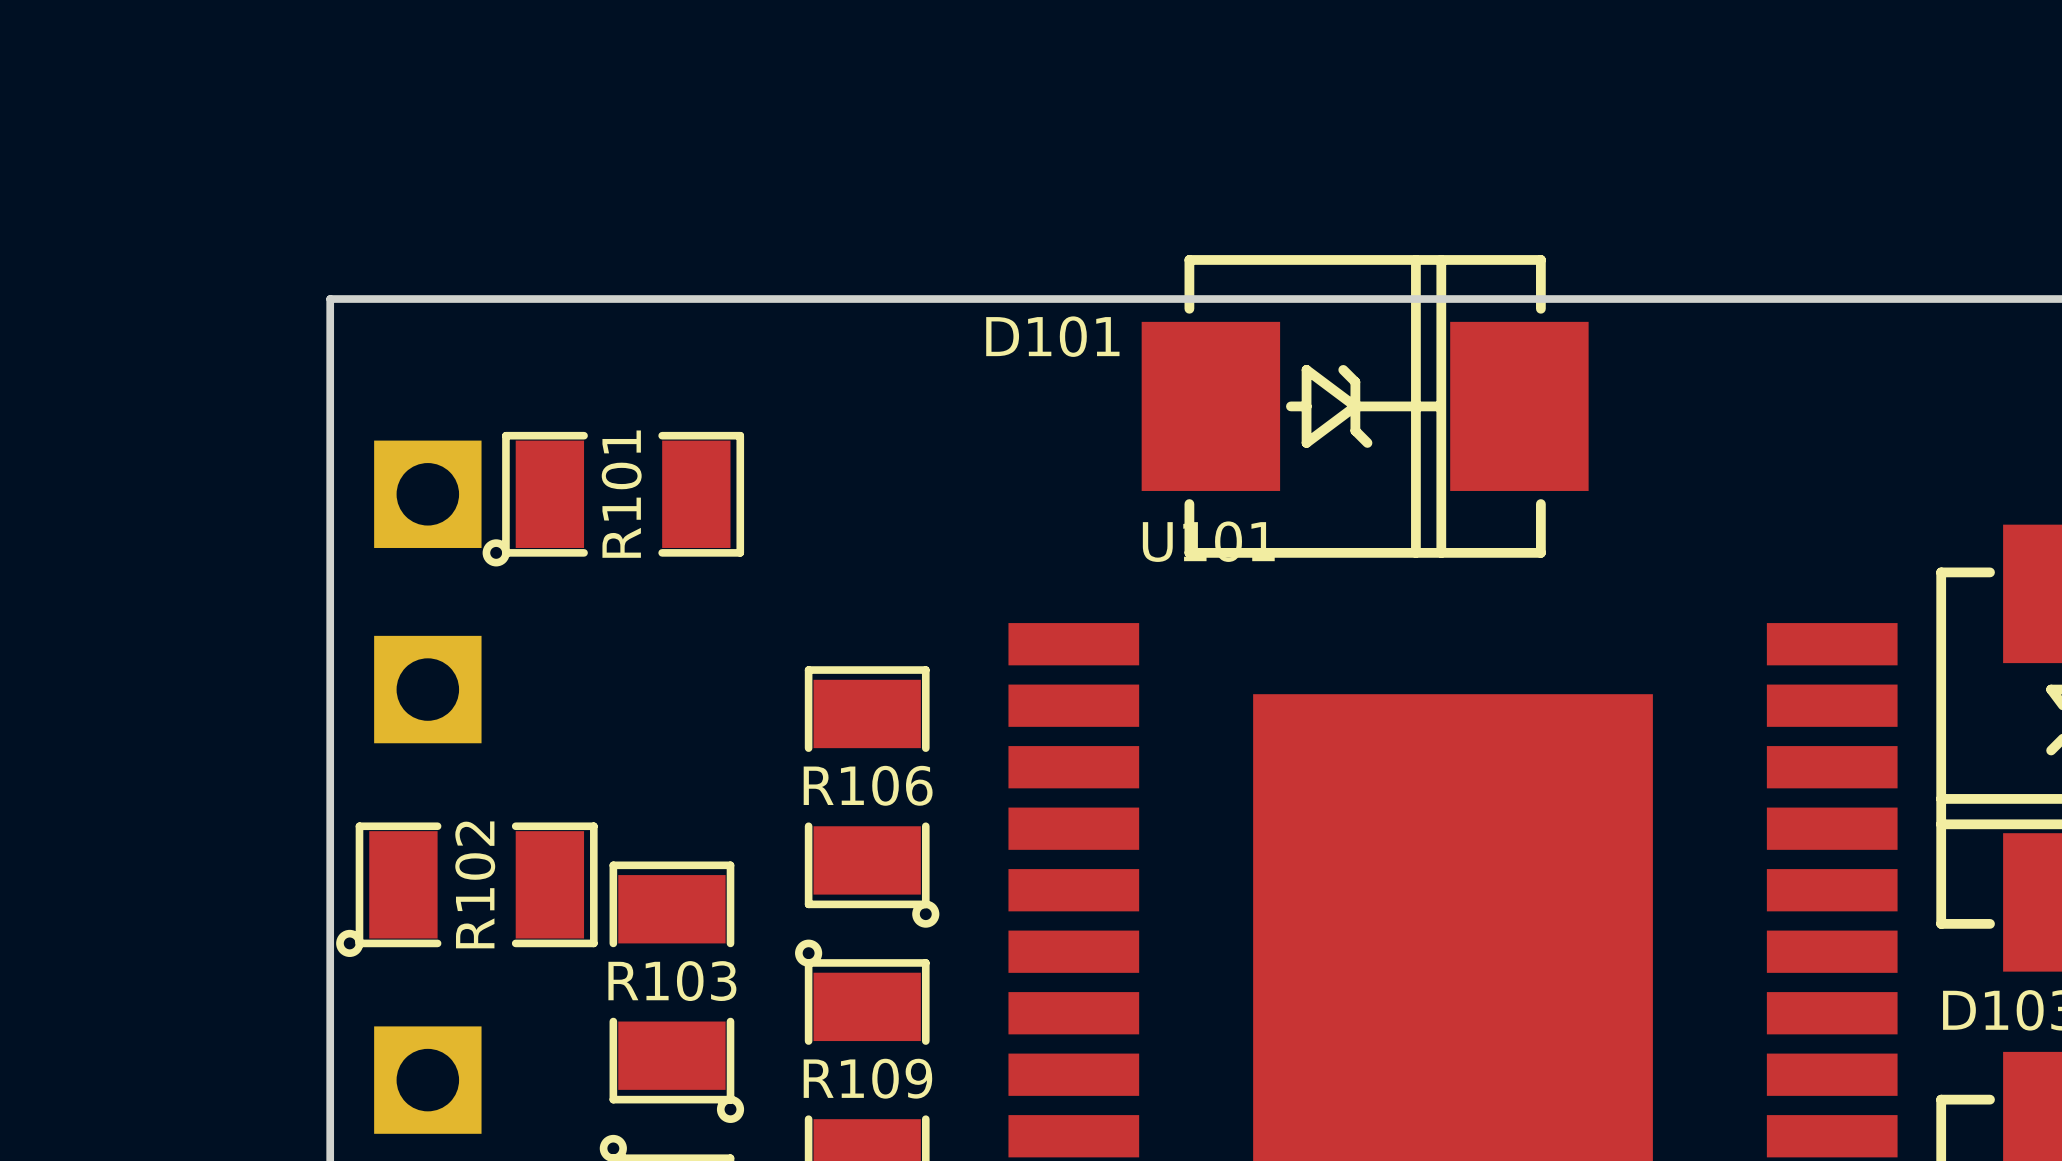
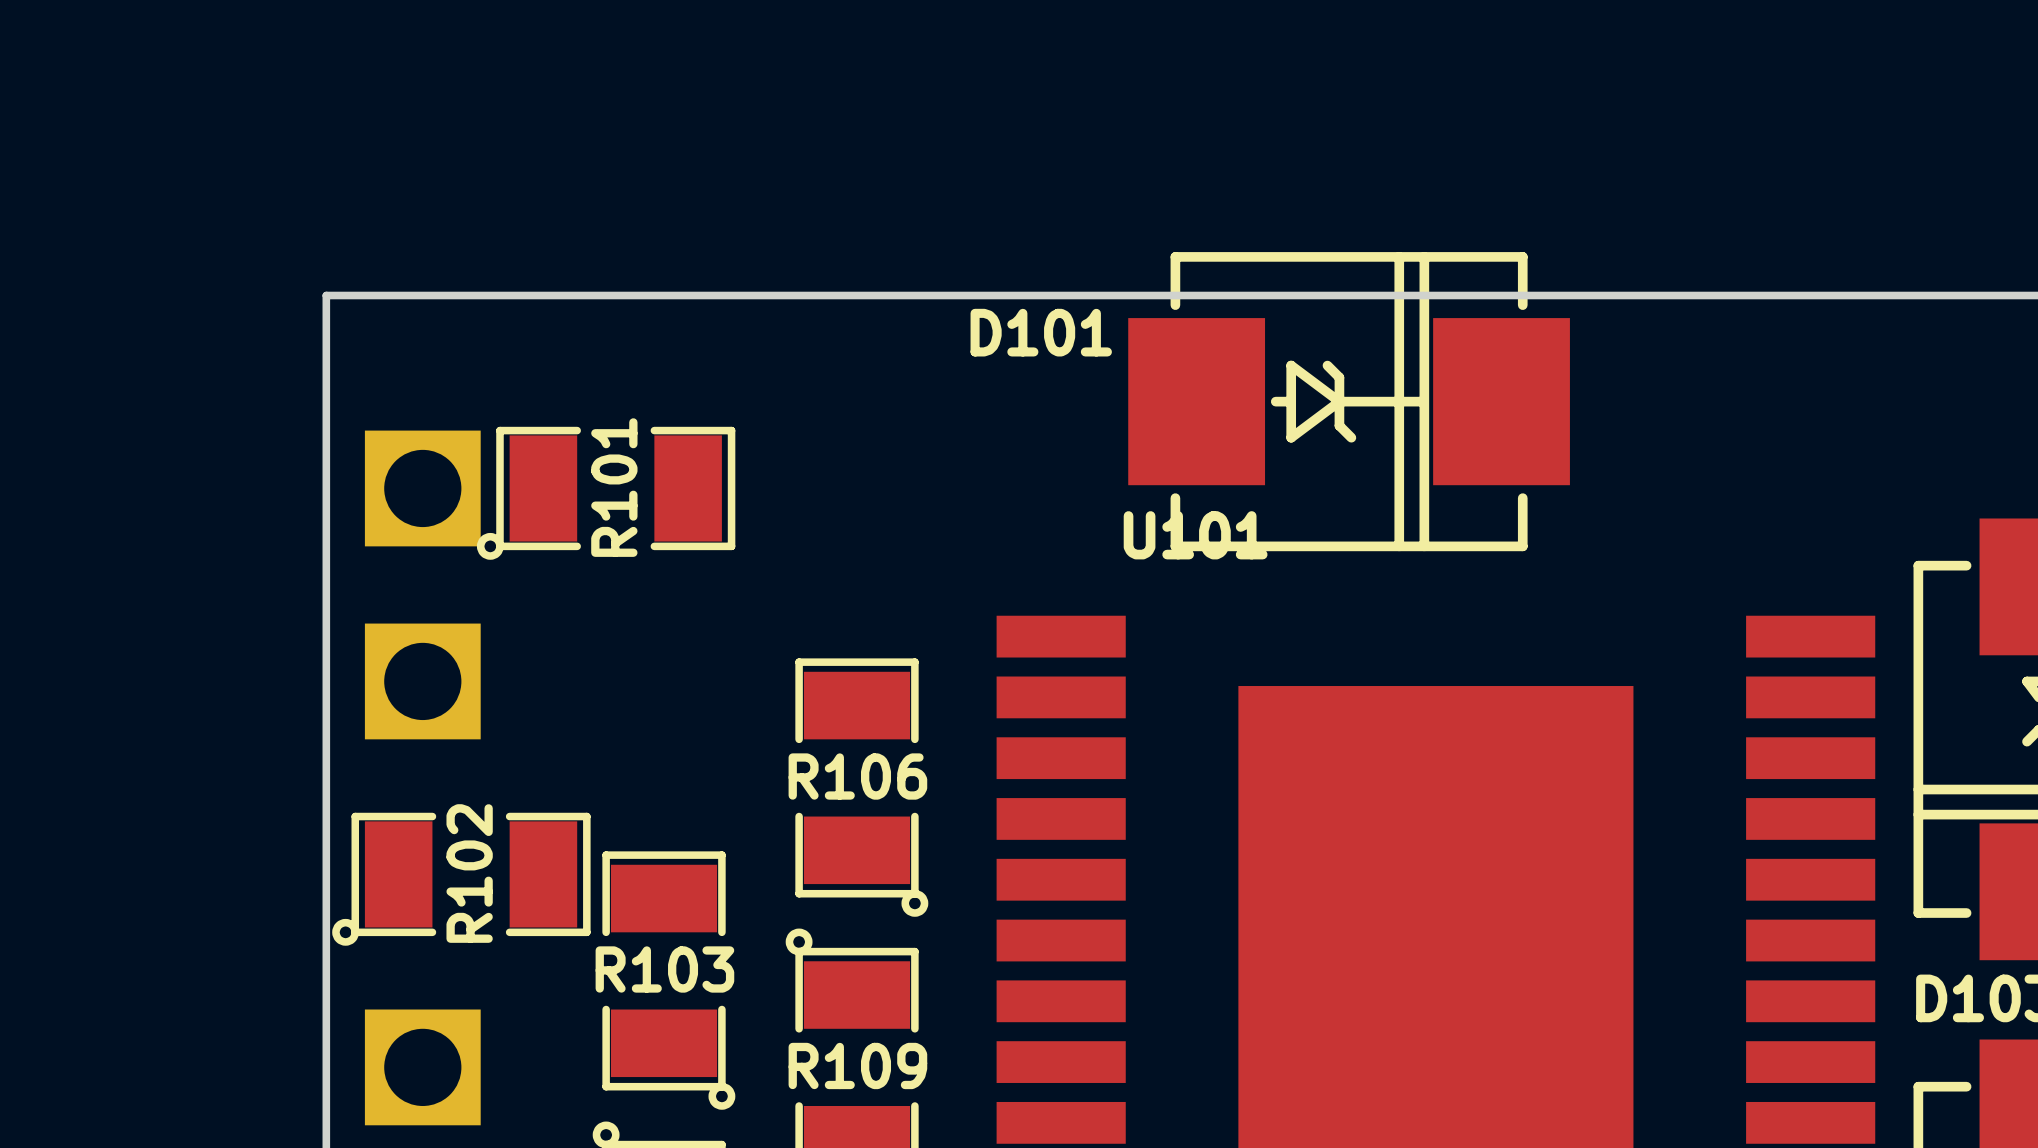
part footprint: [374, 440, 482, 548] -> [364, 430, 481, 547]
part footprint: [374, 635, 482, 744] -> [364, 623, 481, 740]
part footprint: [374, 1026, 482, 1134] -> [364, 1009, 481, 1126]

